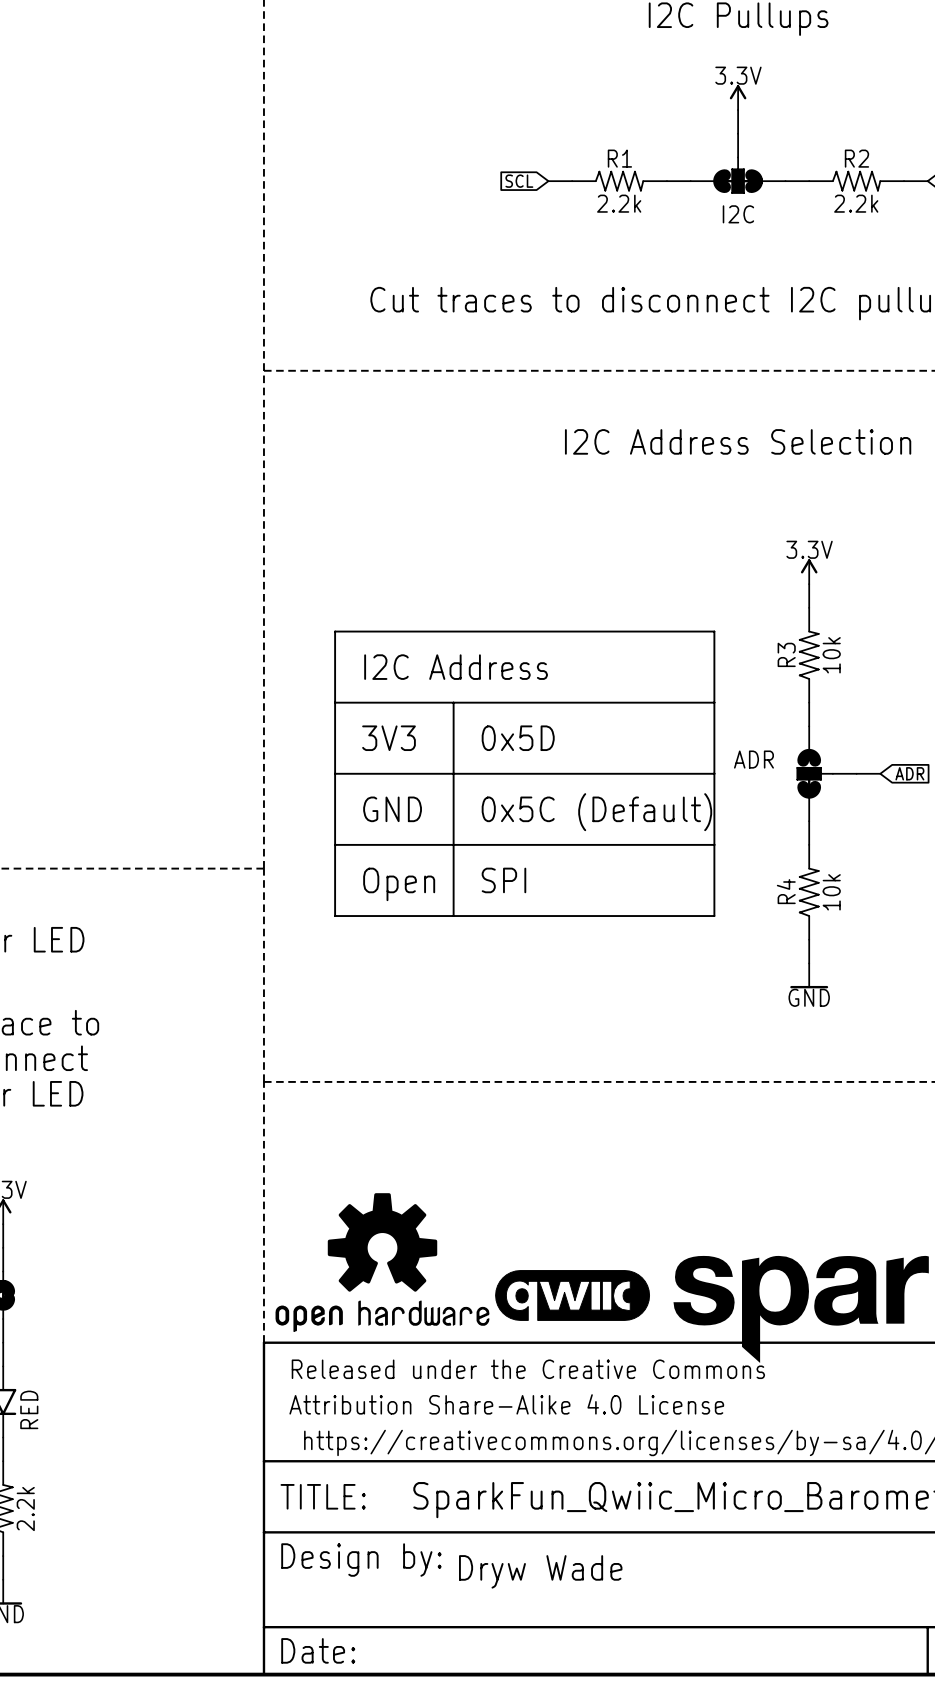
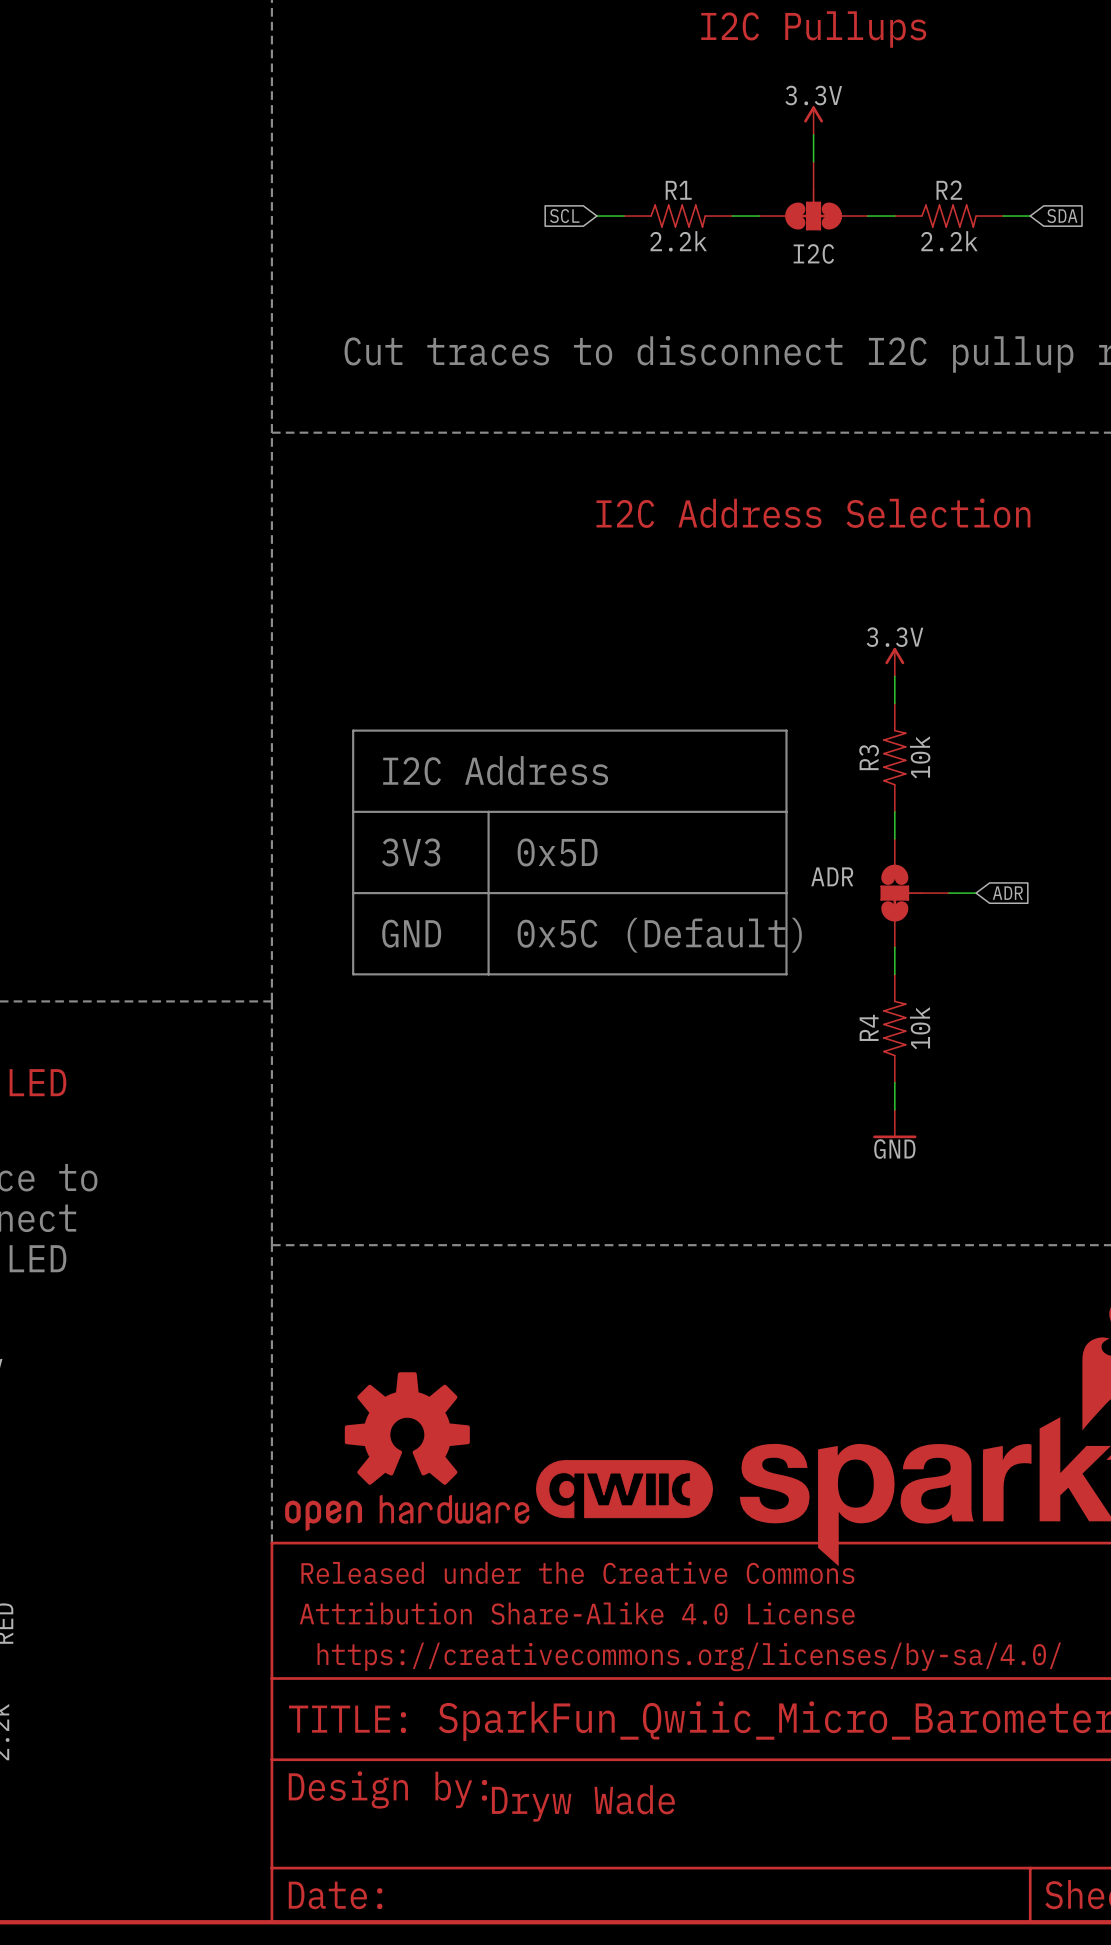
line: (335, 844) (335, 916) (714, 916) (714, 844) -> none
line: (453, 844) (453, 916) -> none
text: SPI (503, 880) -> none
text: Open (399, 884) -> none

